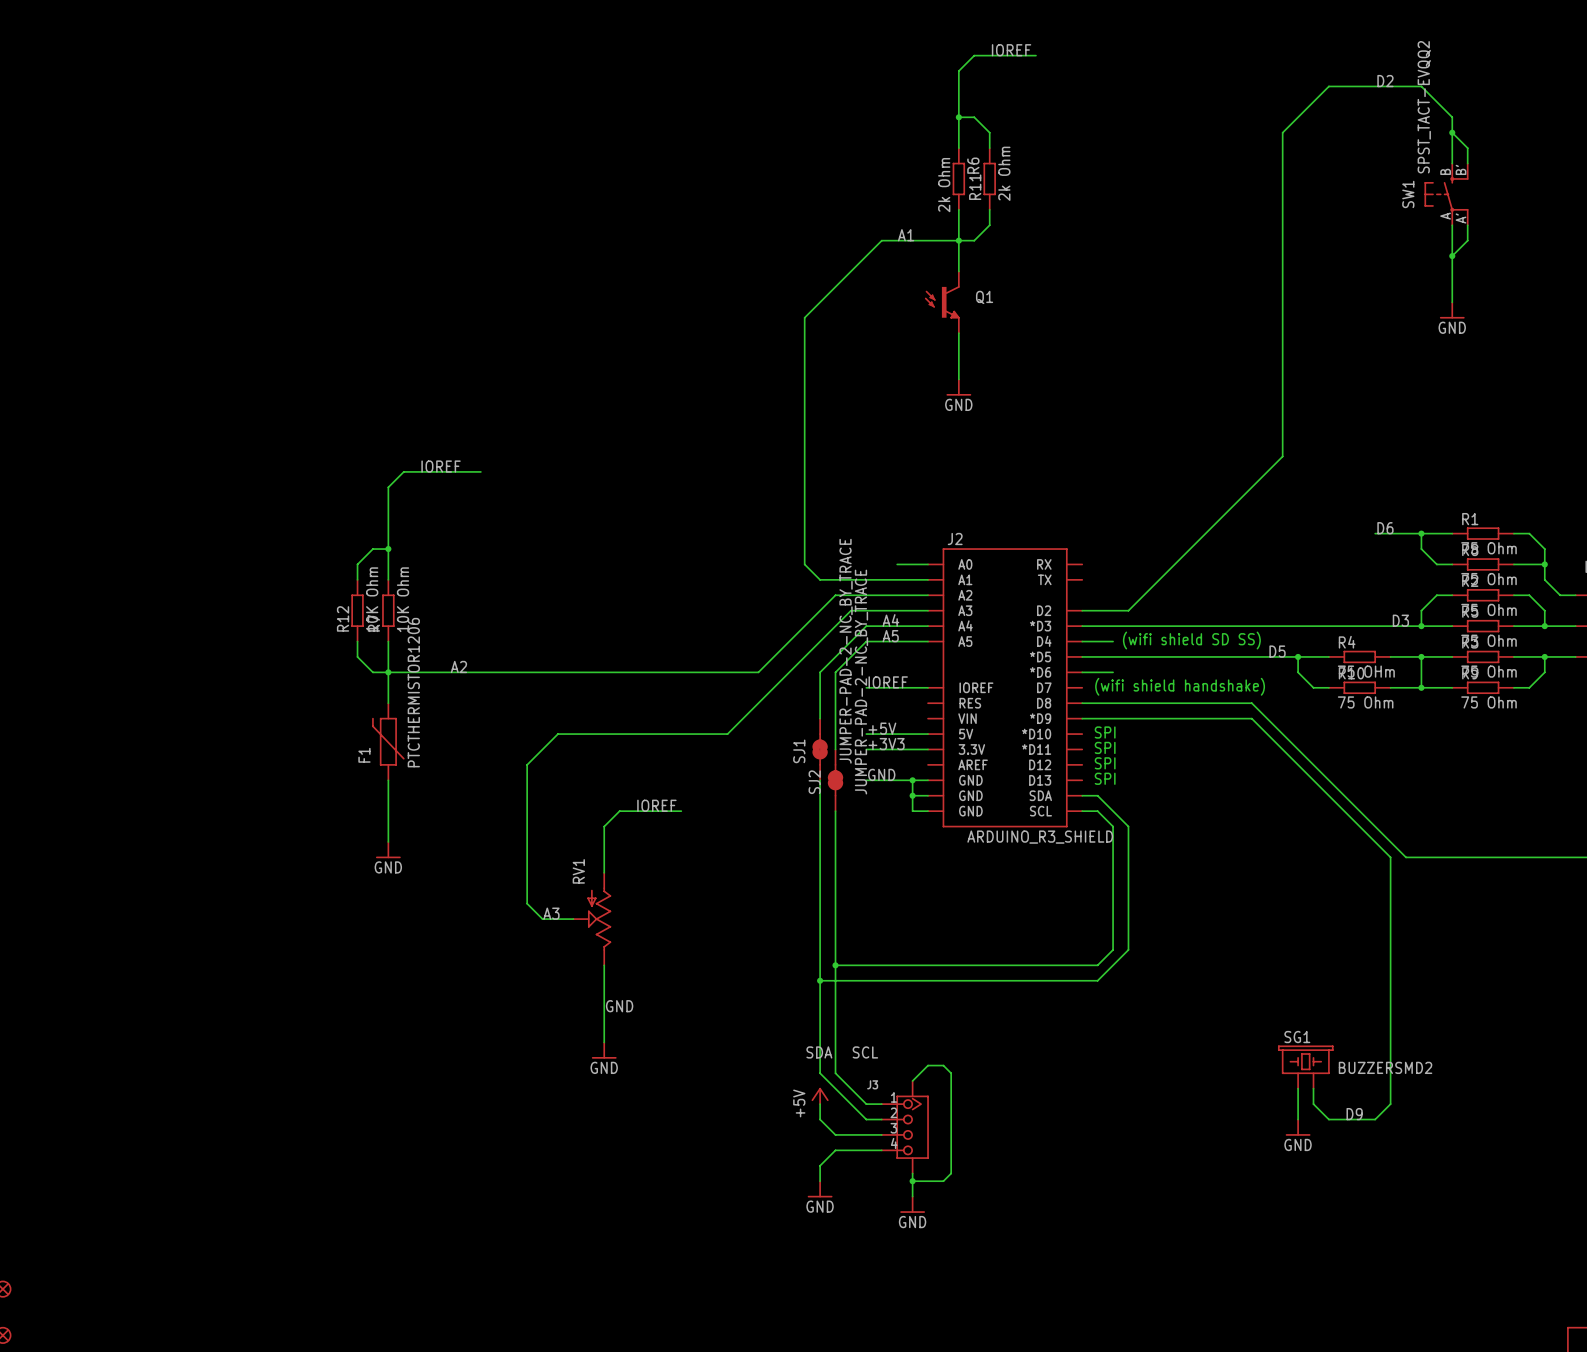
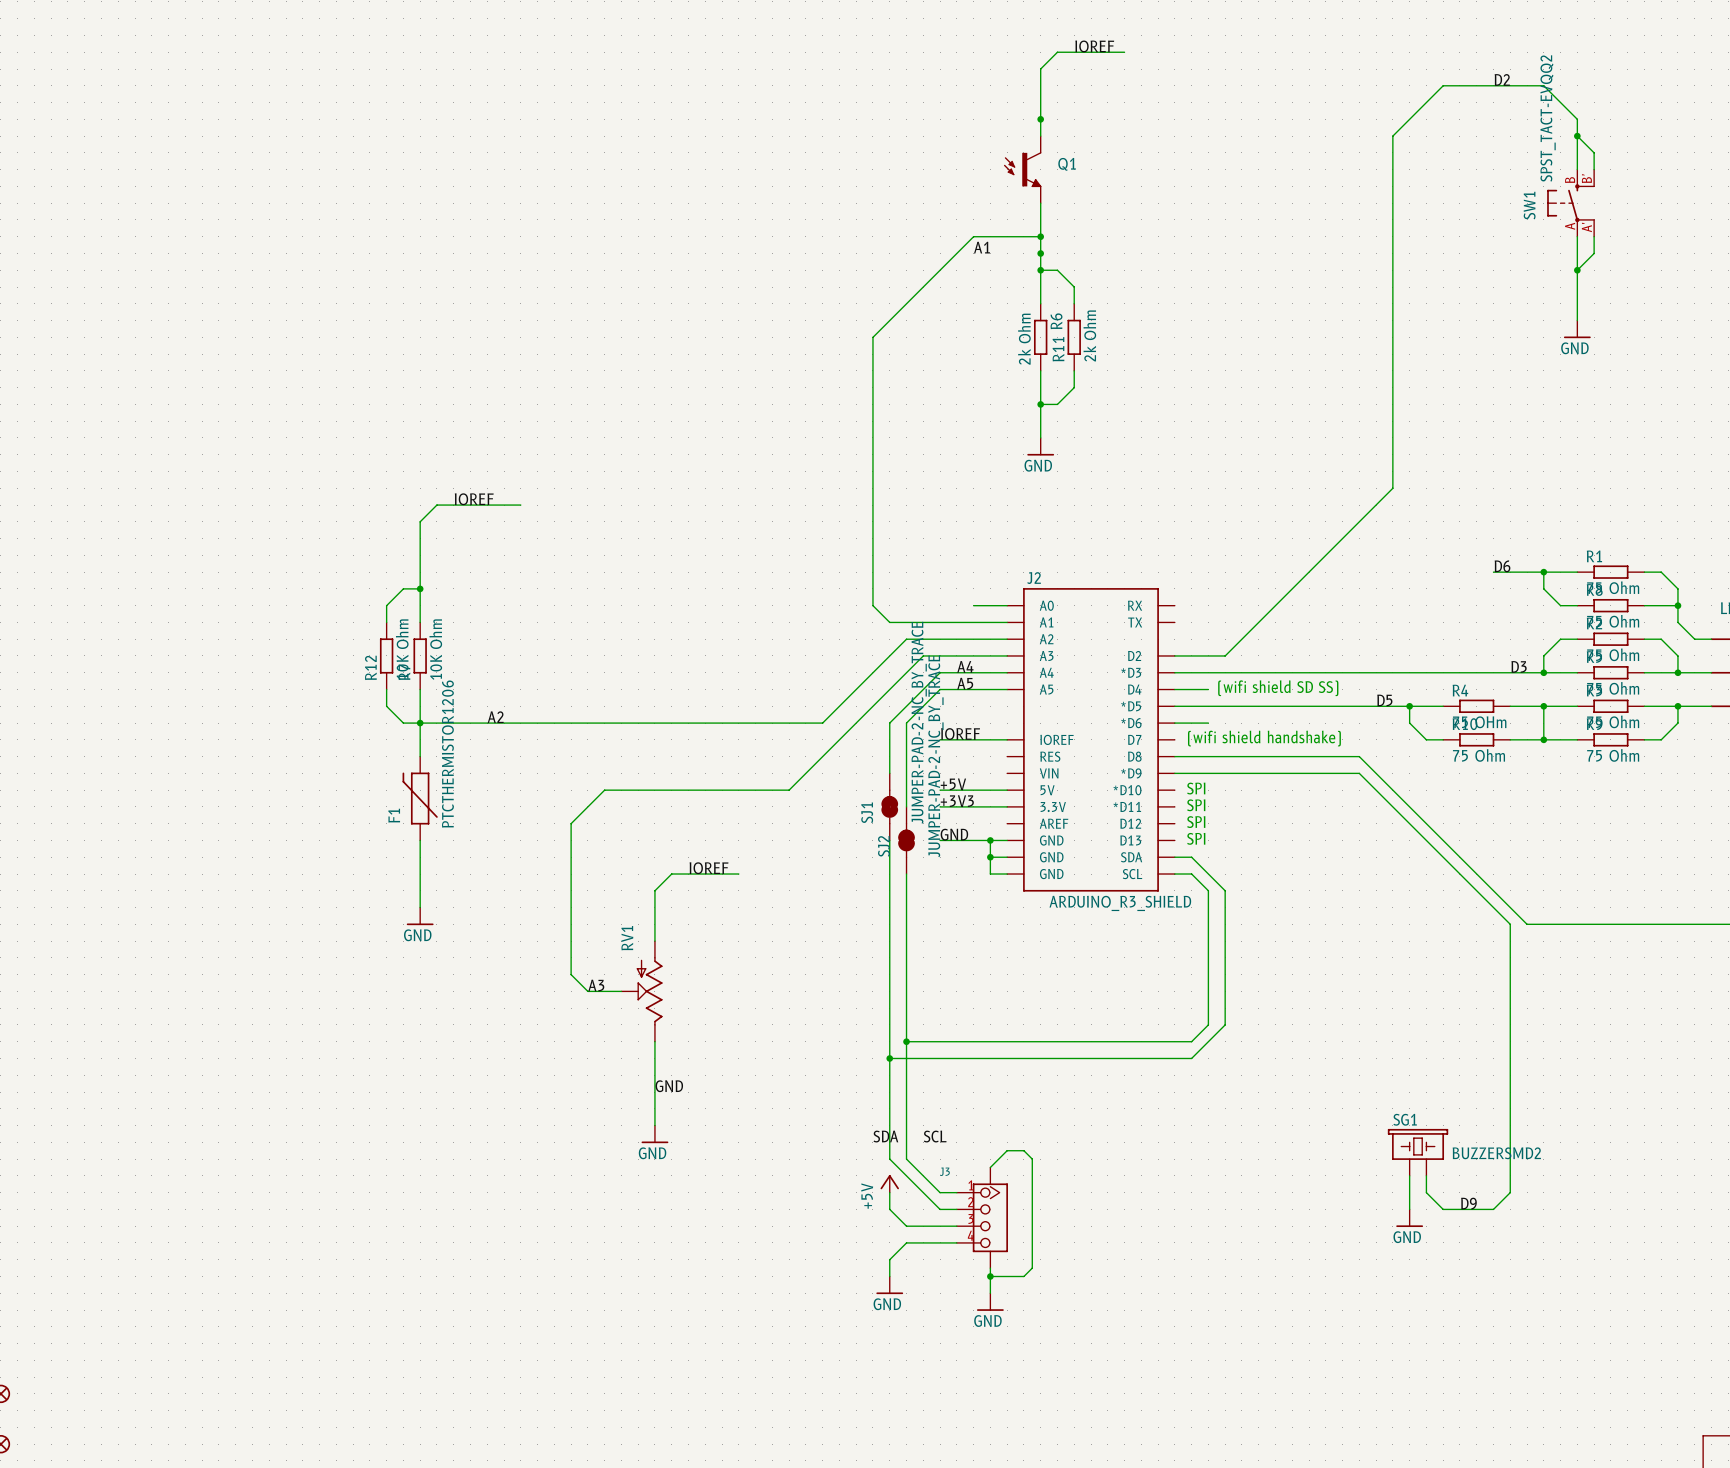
wire: (958, 117) (974, 117) (989, 132) (989, 148) -> (1040, 270) (1057, 270) (1074, 287) (1074, 303)
R6 position: (958, 178) -> (1040, 337)
R11 position: (989, 178) -> (1074, 337)
wire: (989, 209) (989, 225) (974, 240) (881, 240) -> (1040, 236) (973, 236) (956, 253)
junction: none -> (1040, 236)
junction: none -> (1040, 270)
Q1 position: (942, 302) -> (1022, 169)
wire: none -> (1074, 370) (1074, 387) (1057, 404) (1040, 404) (1040, 437)
junction: none -> (1040, 404)
power symbol position: GND (958, 387) -> GND (1040, 446)

